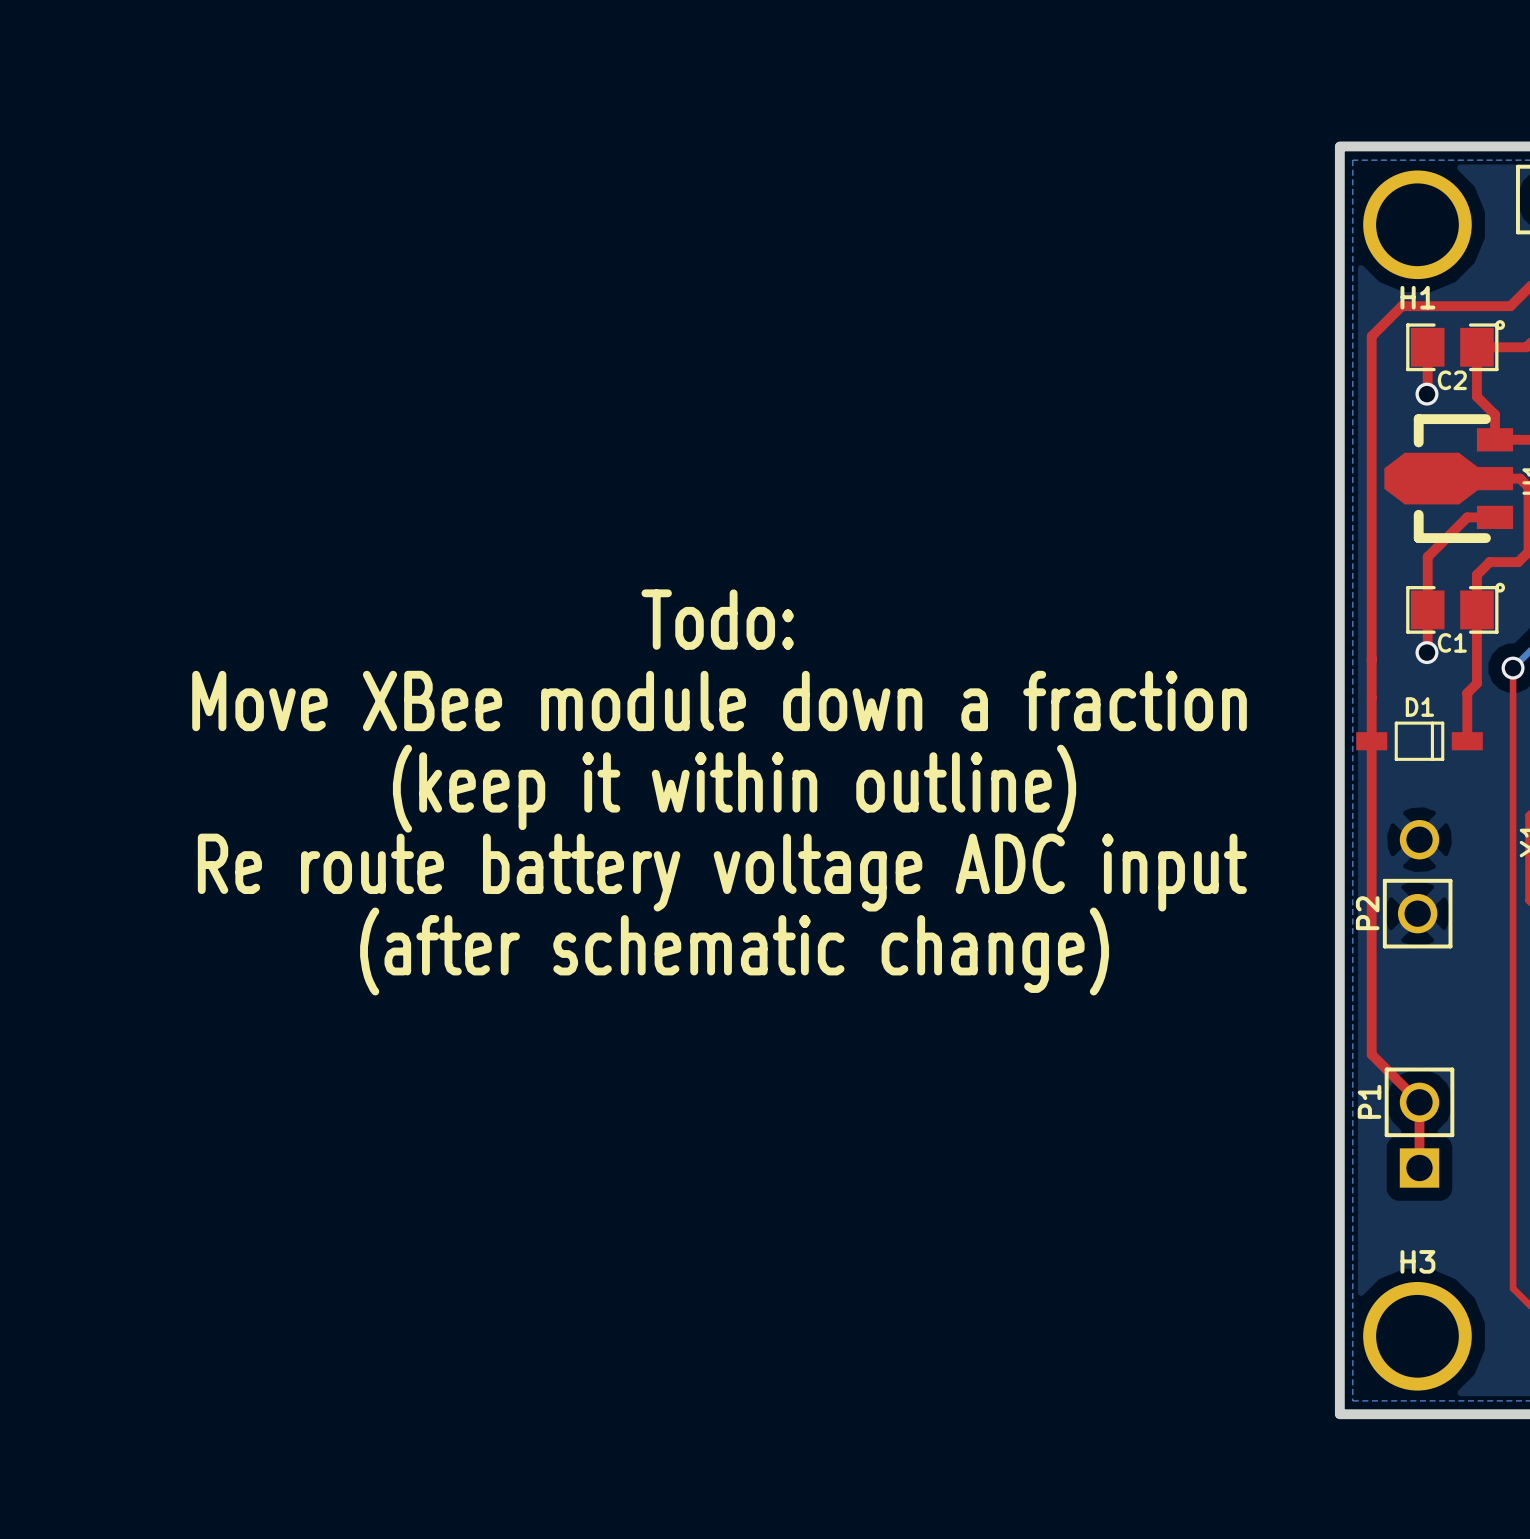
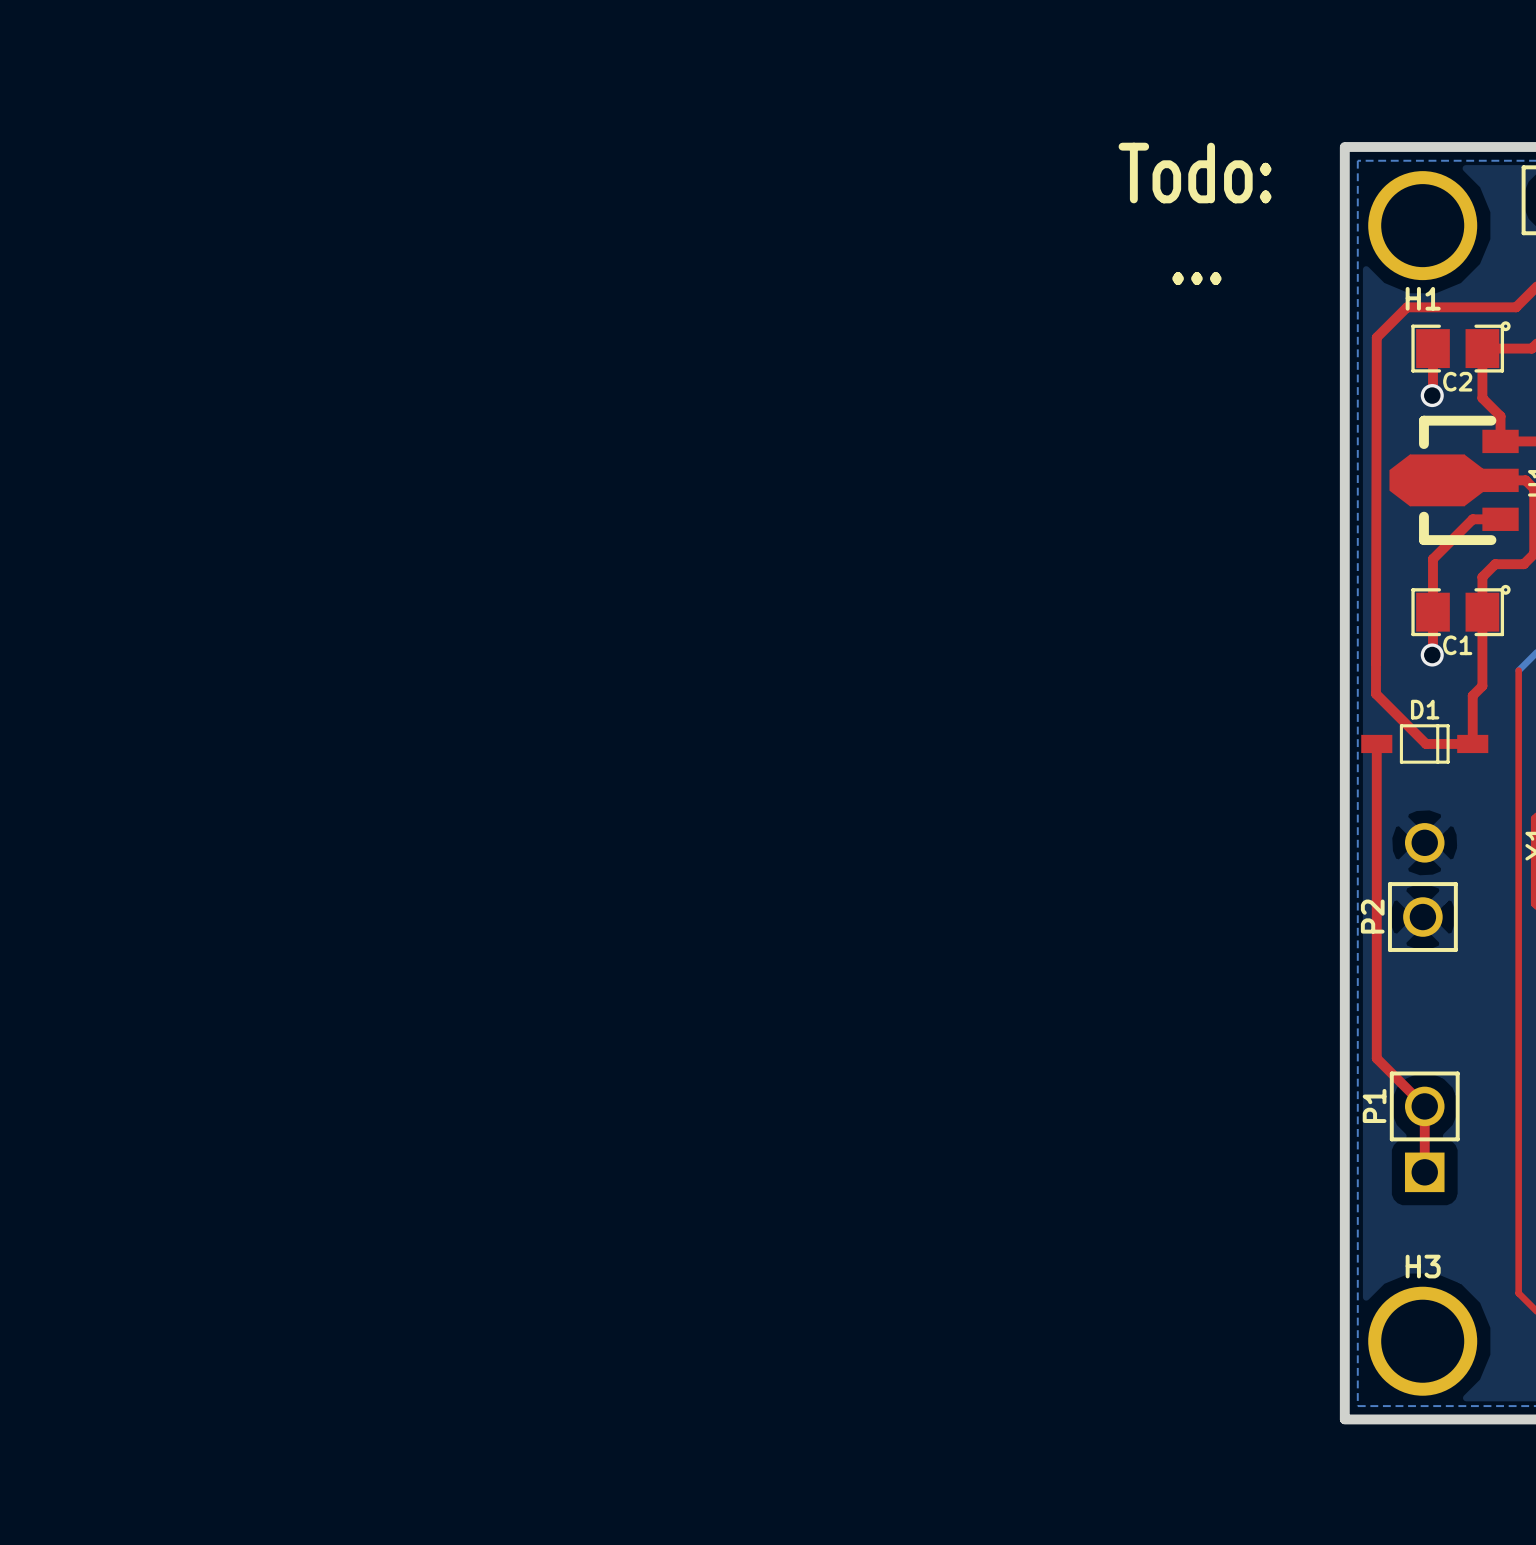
text: none -> Todo: (1195, 173)
text: none -> ... (1196, 278)
top track: (1371, 336) (1371, 741) -> (1376, 337) (1375, 693) (1426, 743) (1472, 743)
text: Todo: (717, 619) -> none
via: (1513, 668) -> none
text: Move XBee module down a fraction (719, 700) -> none
text: (keep it within outline) (734, 788) -> none
text: Re route battery voltage ADC input (722, 872) -> none
text: (after schematic change) (734, 951) -> none

